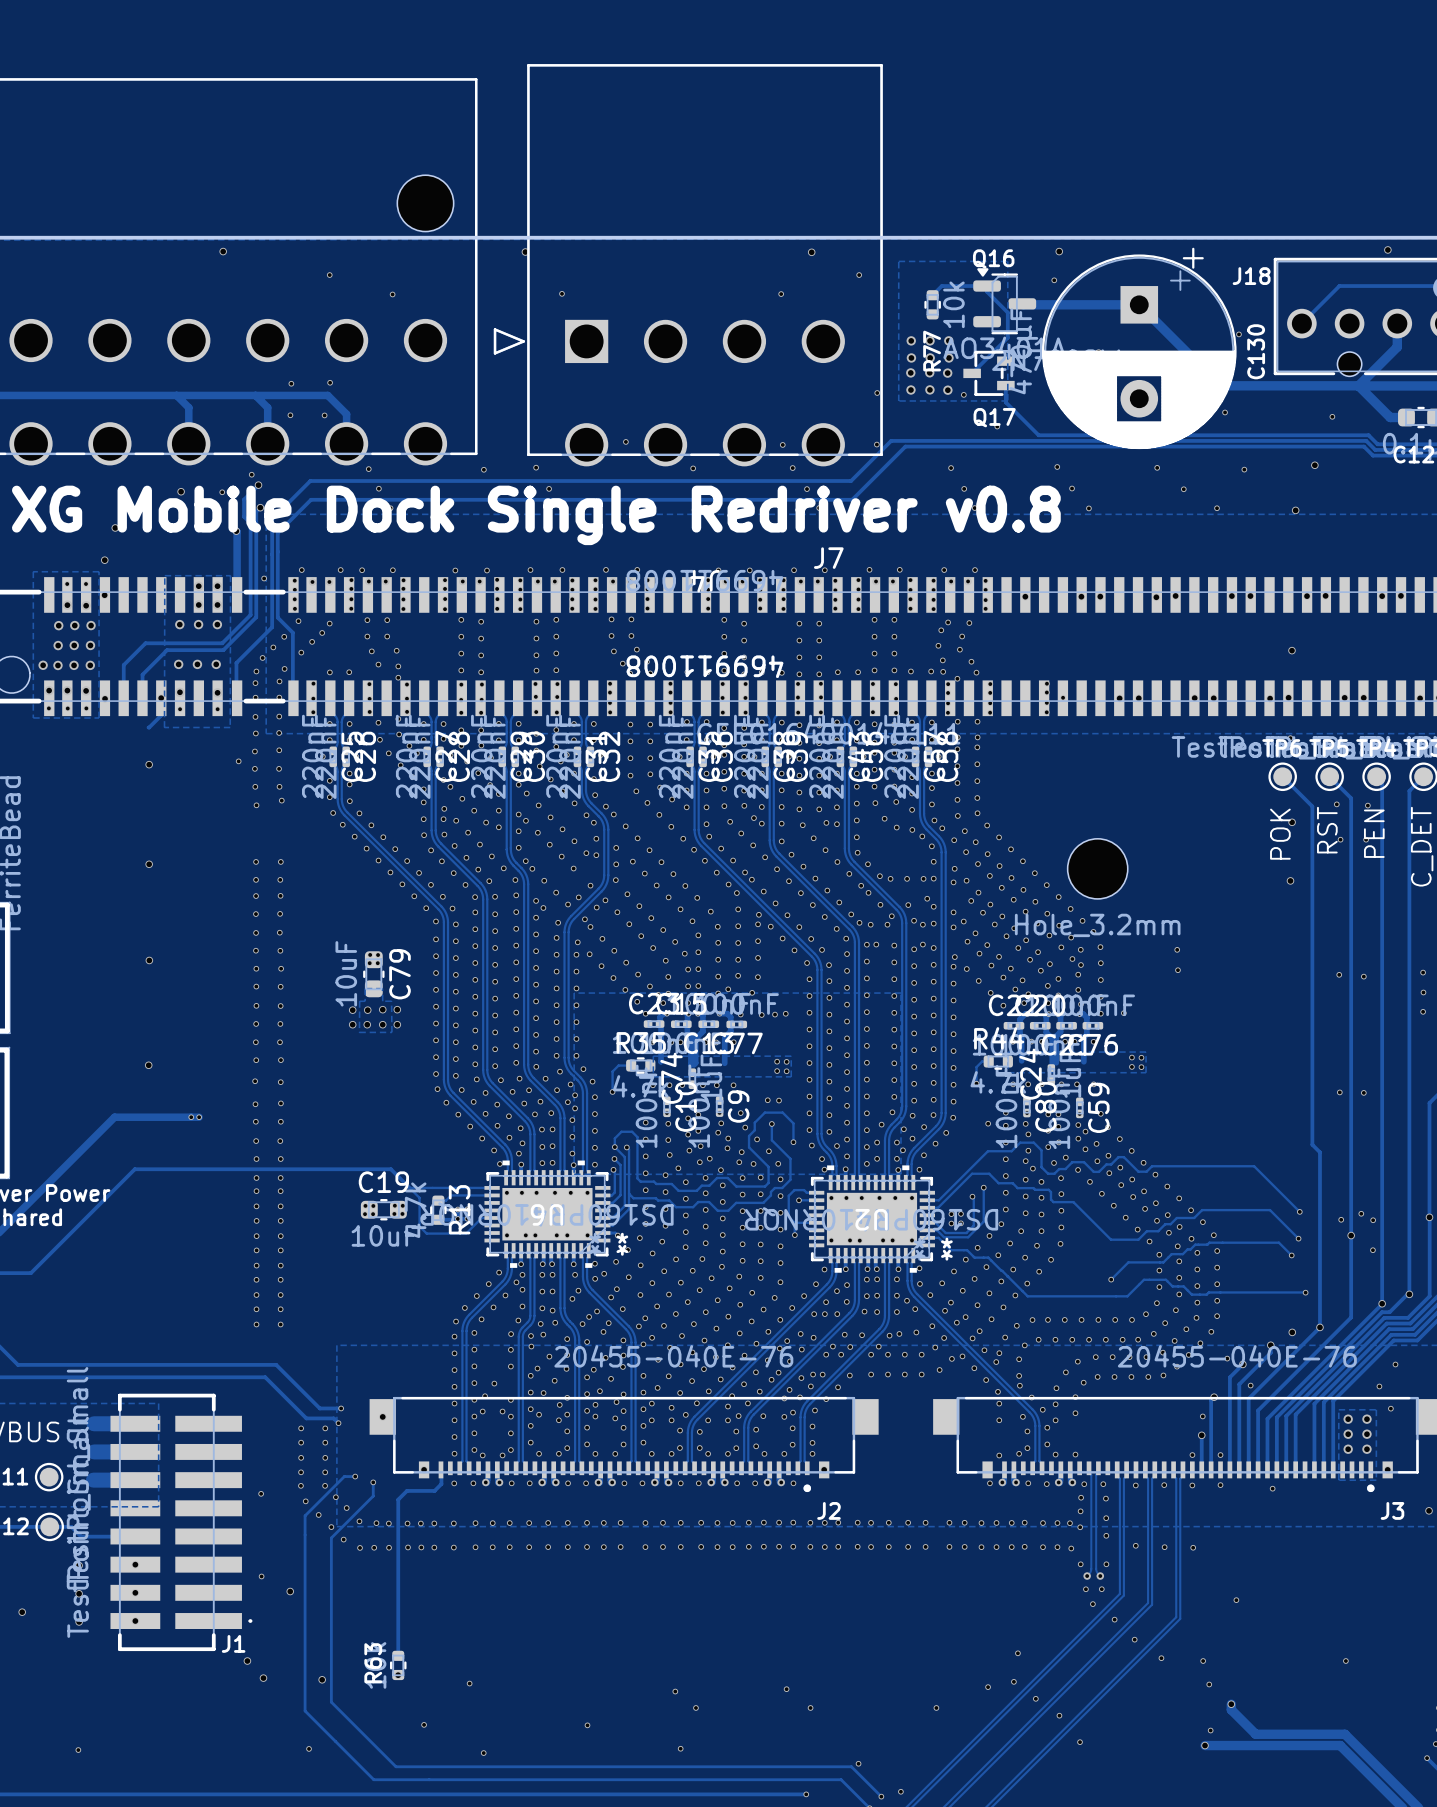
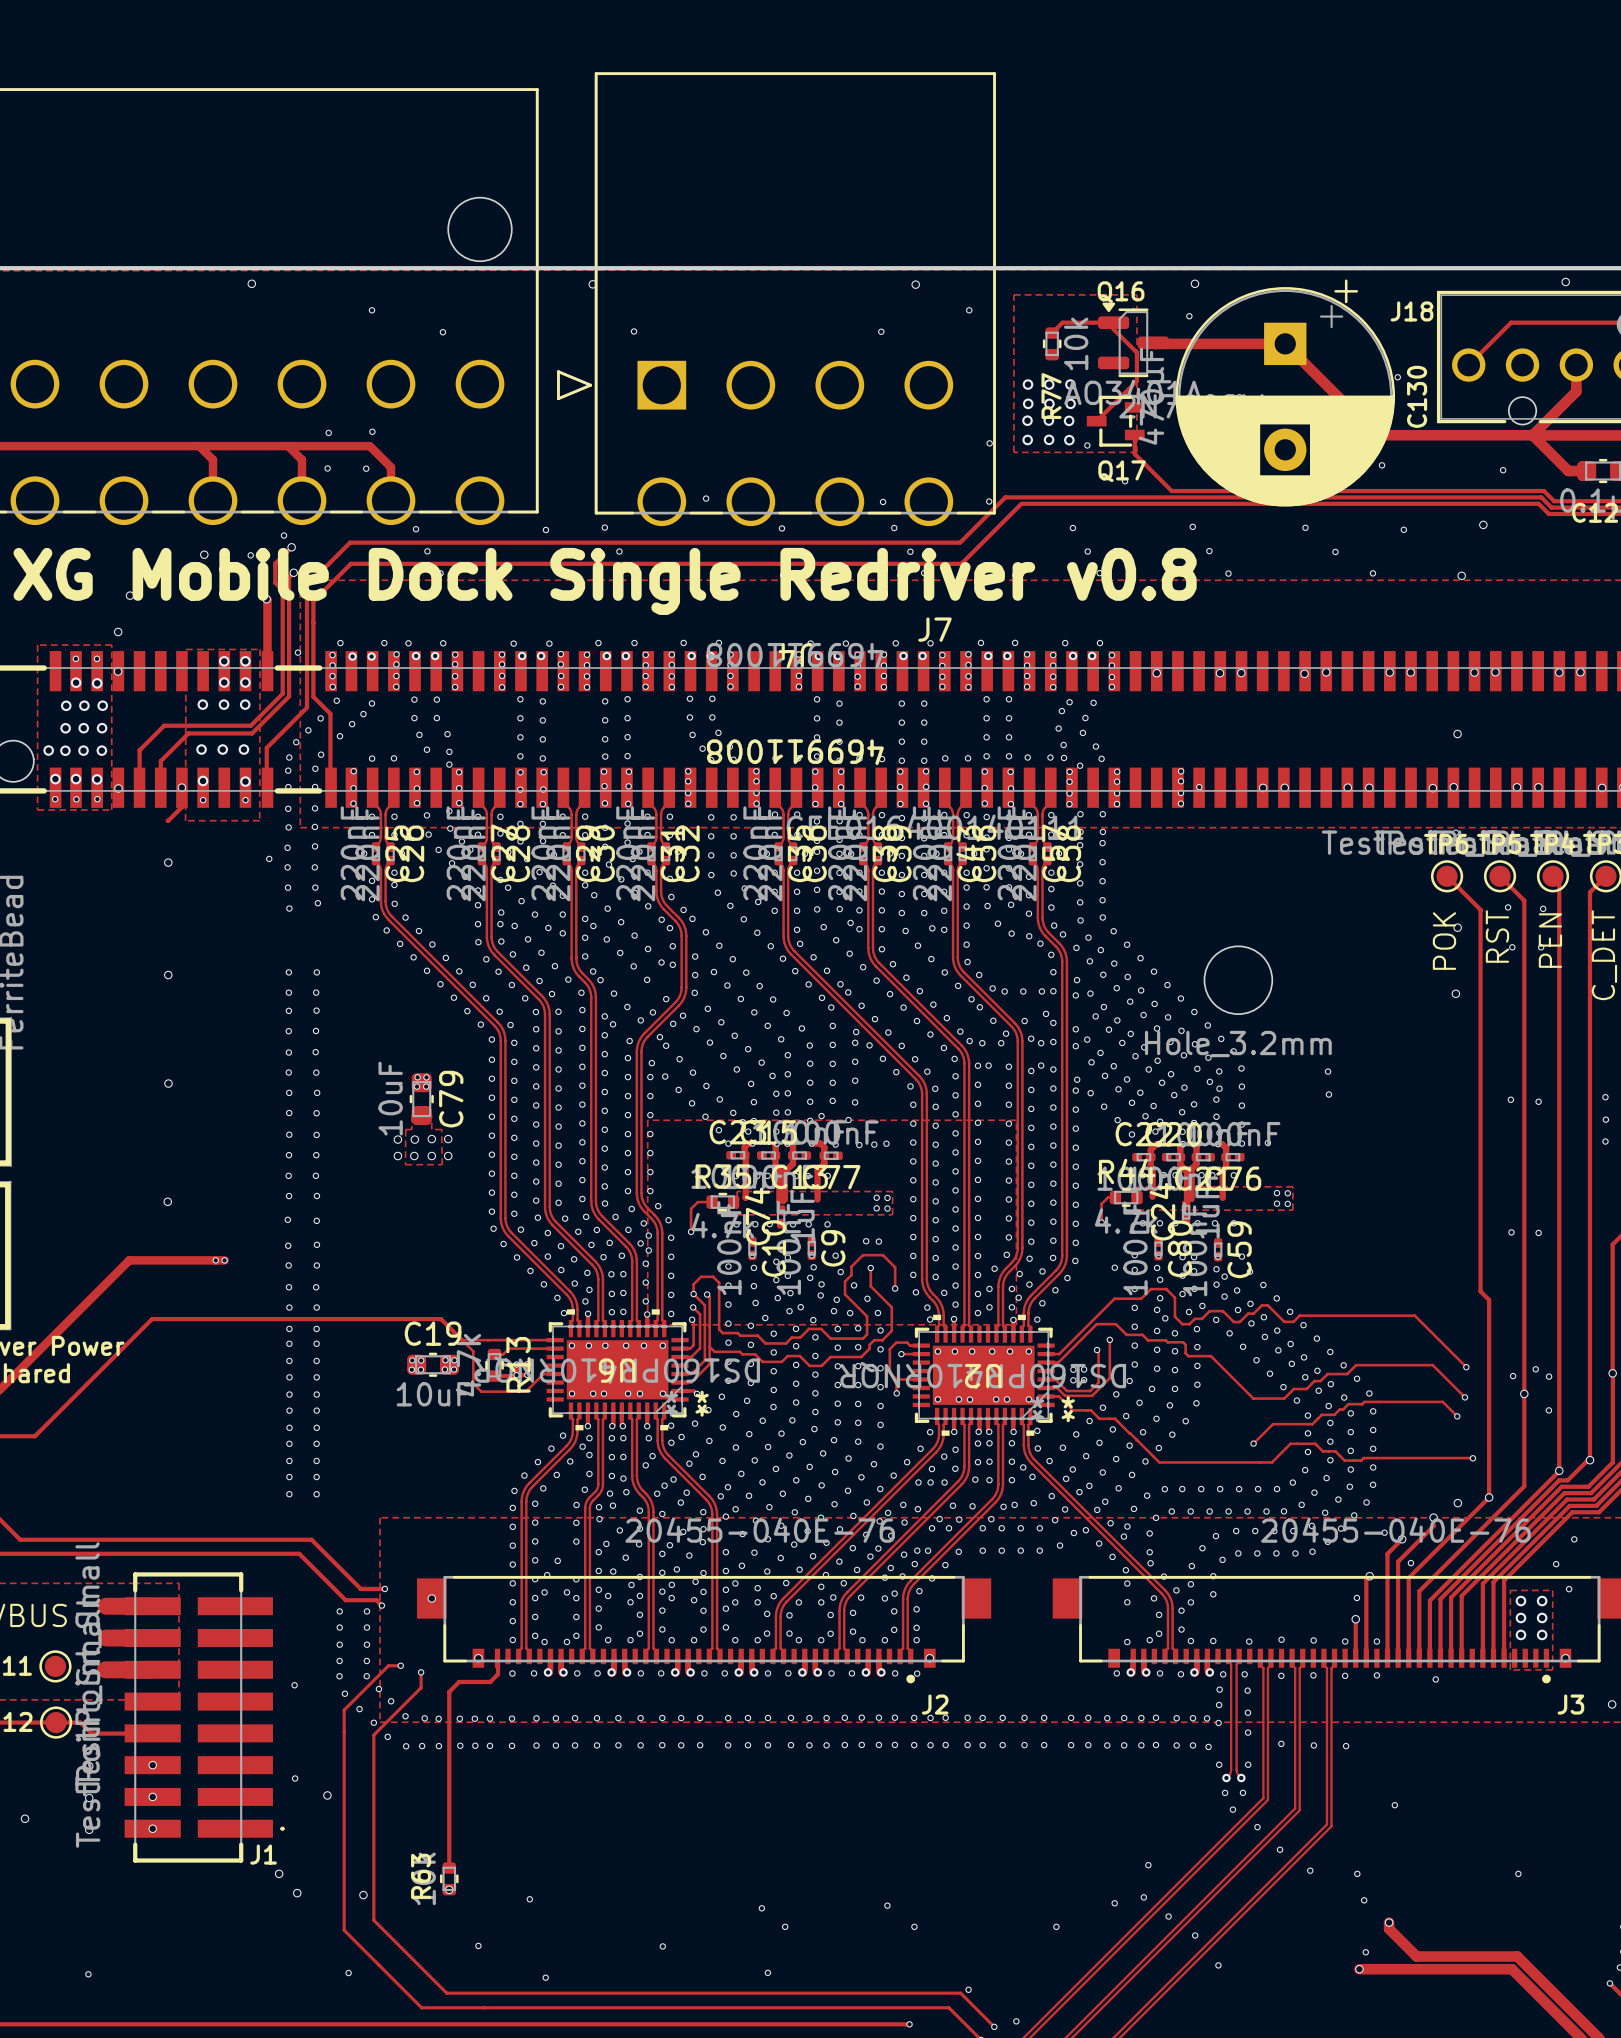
via: none -> (1281, 1639)
via: none -> (1313, 1640)
via: none -> (1249, 1641)
via: none -> (917, 1673)

